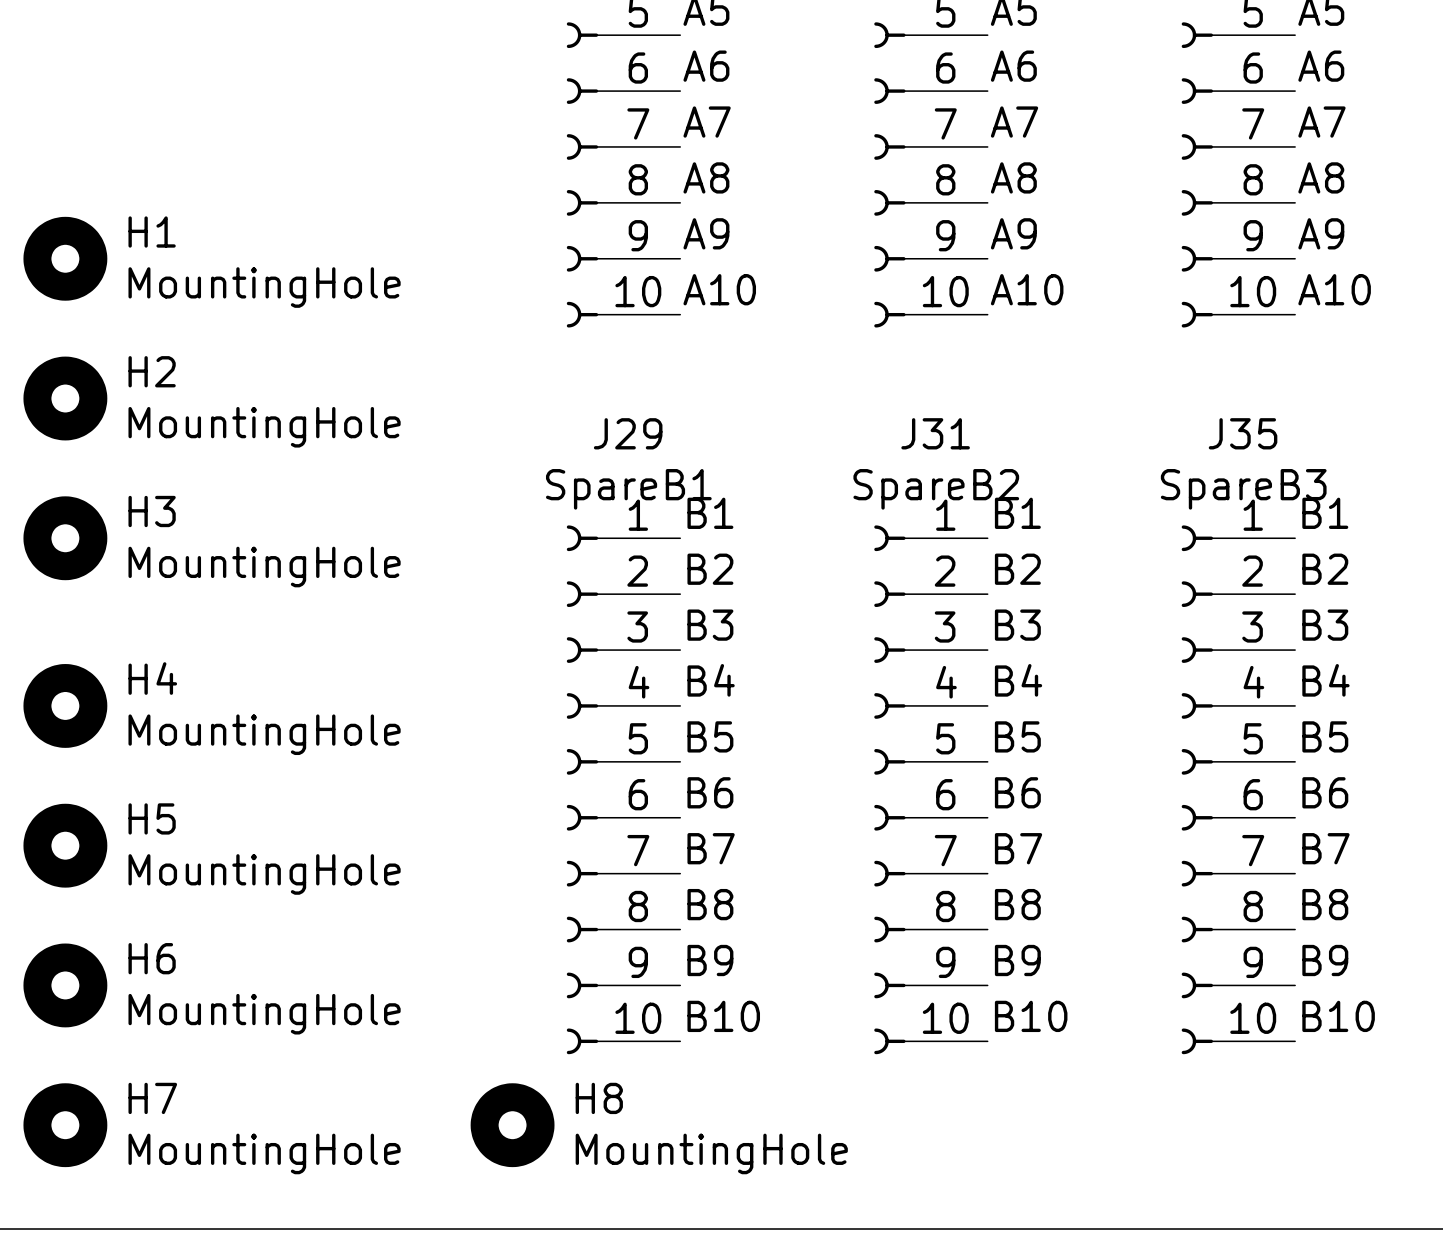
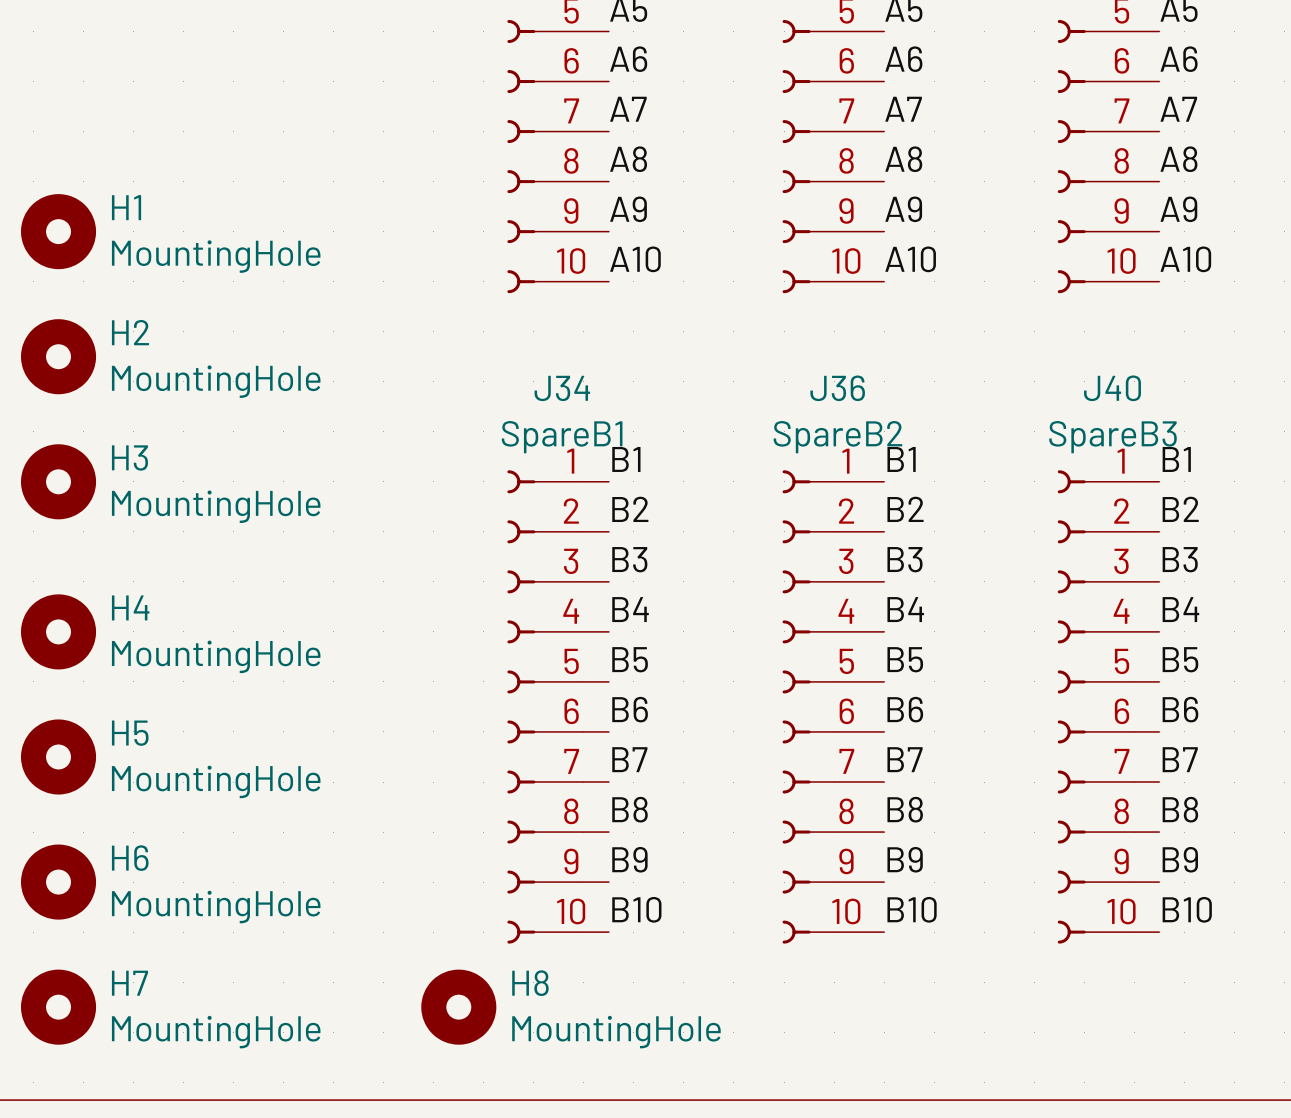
J29 name: J29 (628, 433) -> J34 (562, 388)
J31 name: J31 (935, 433) -> J36 (837, 388)
J35 name: J35 (1243, 433) -> J40 (1112, 388)

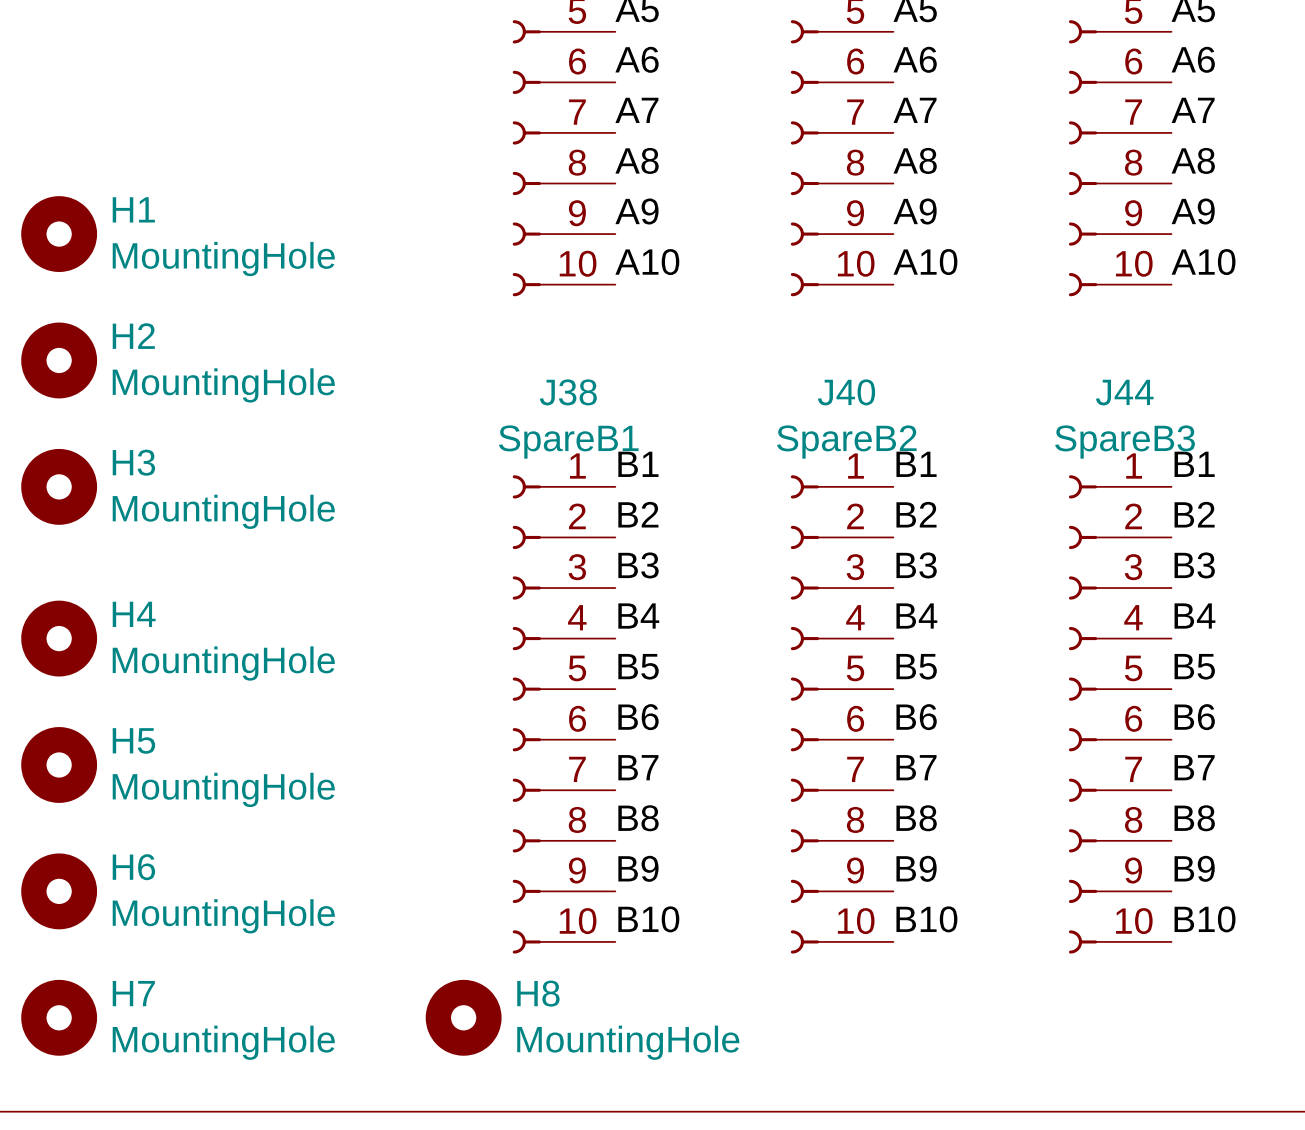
J34 name: J34 (562, 388) -> J38 (568, 392)
J36 name: J36 (837, 388) -> J40 (846, 392)
J40 name: J40 (1112, 388) -> J44 (1124, 392)

